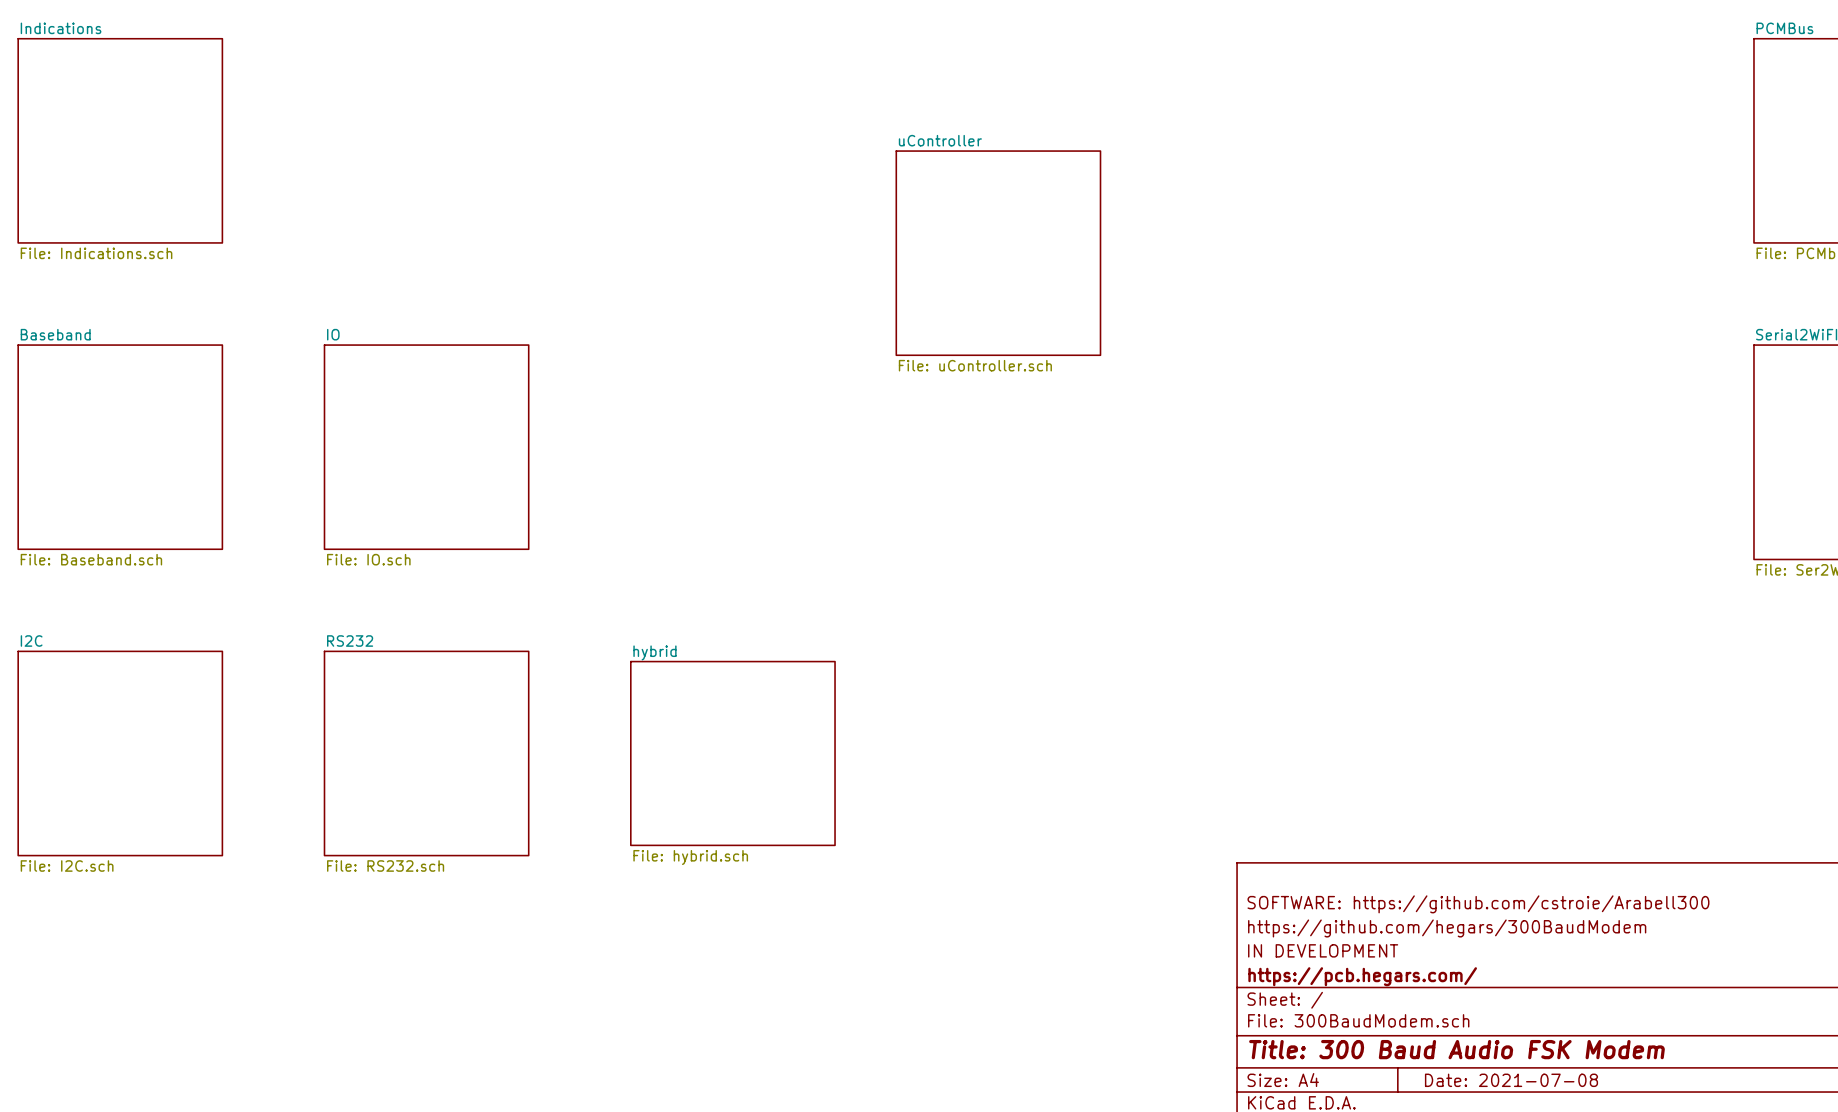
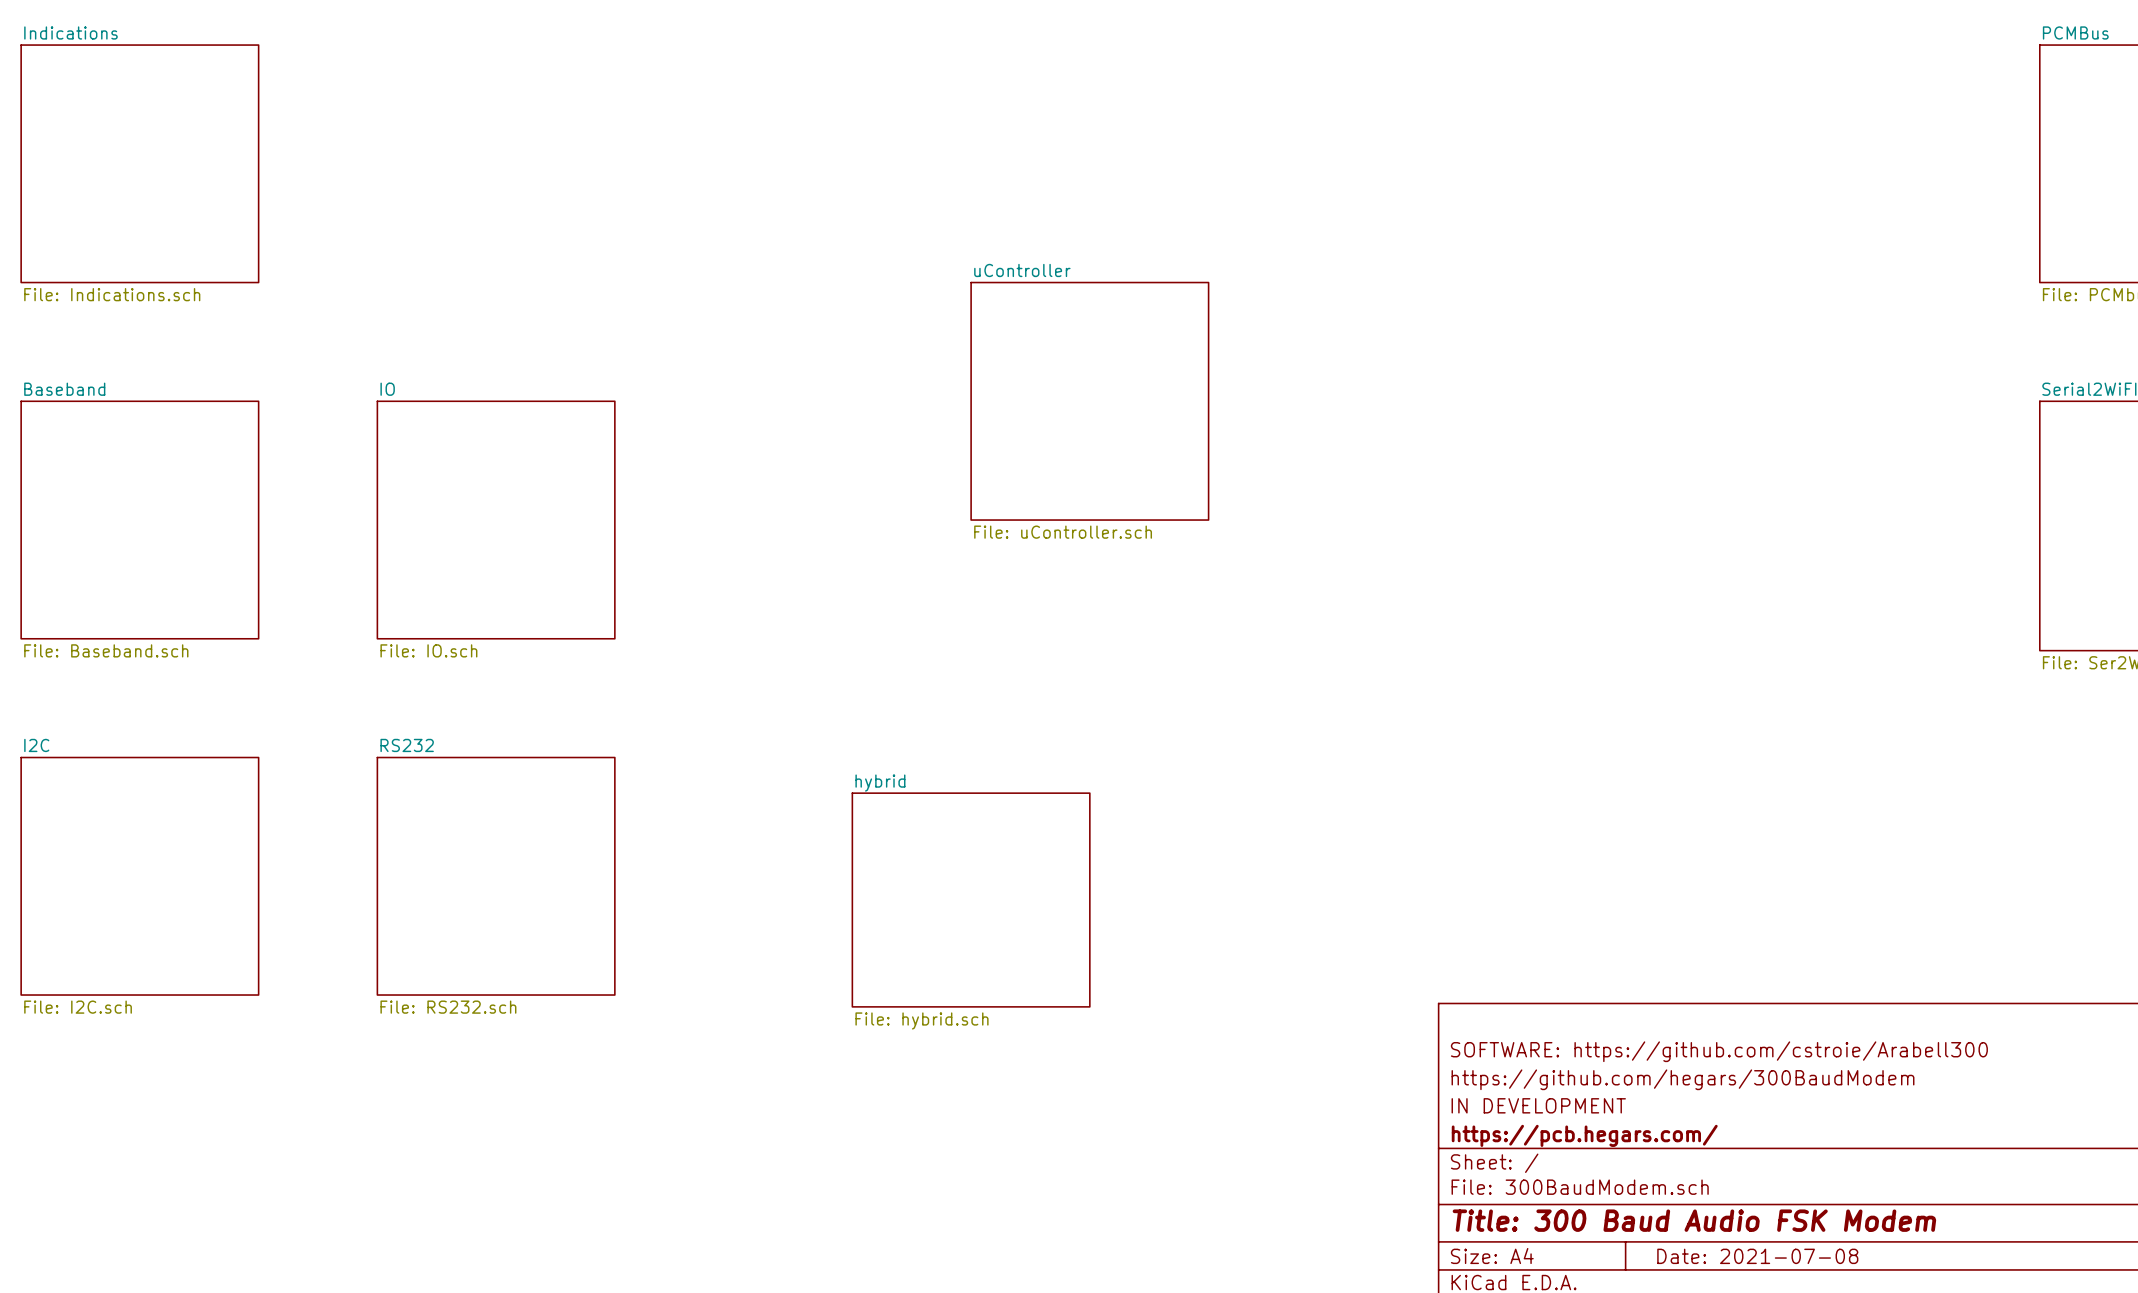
sheet uController position: (998, 253) -> (1089, 401)
sheet hybrid position: (732, 753) -> (971, 900)

